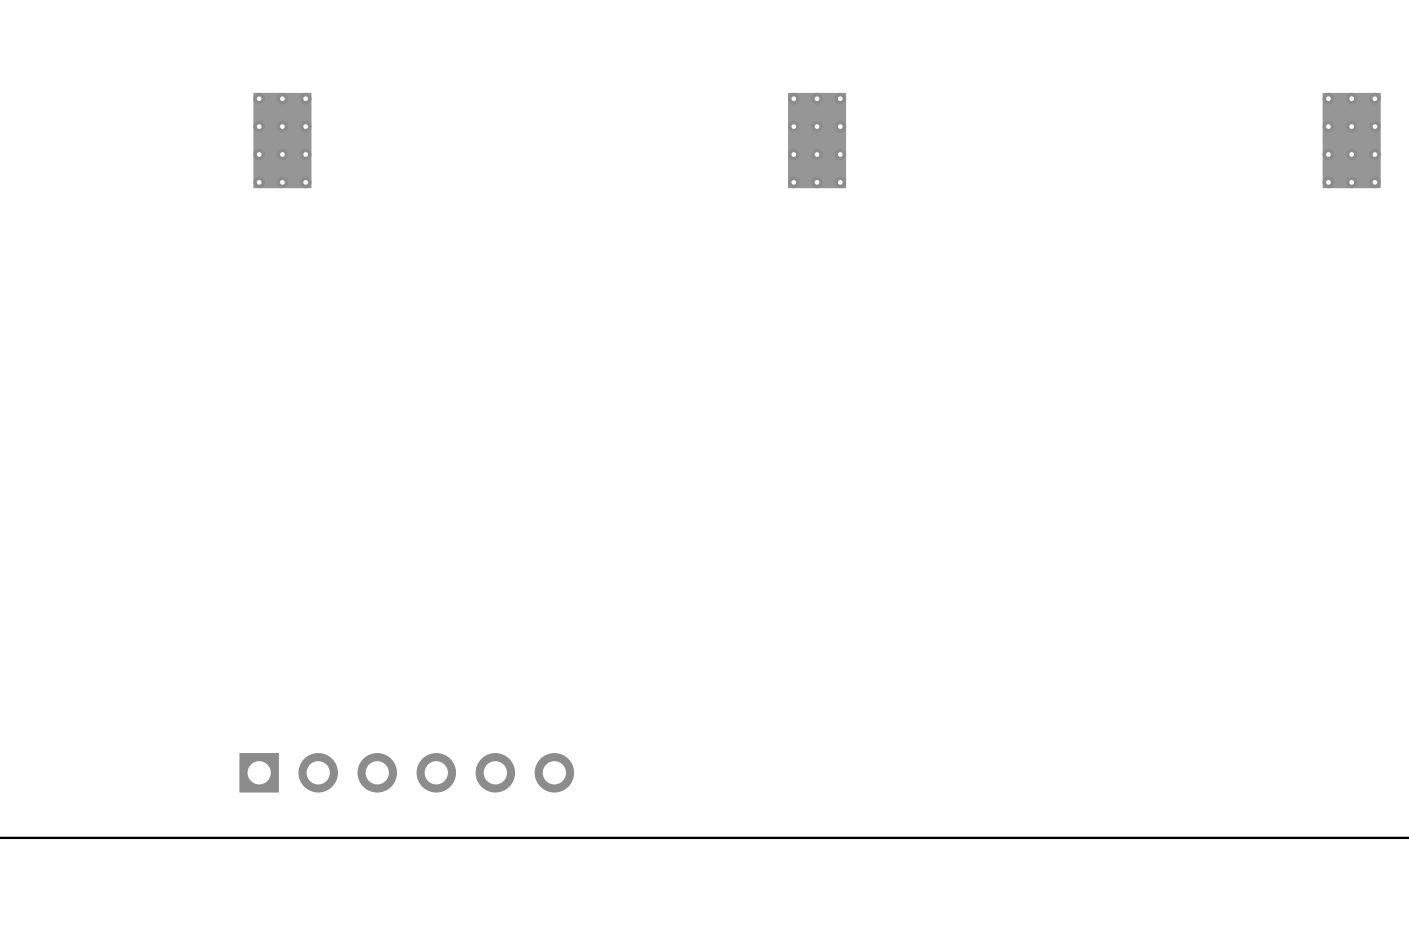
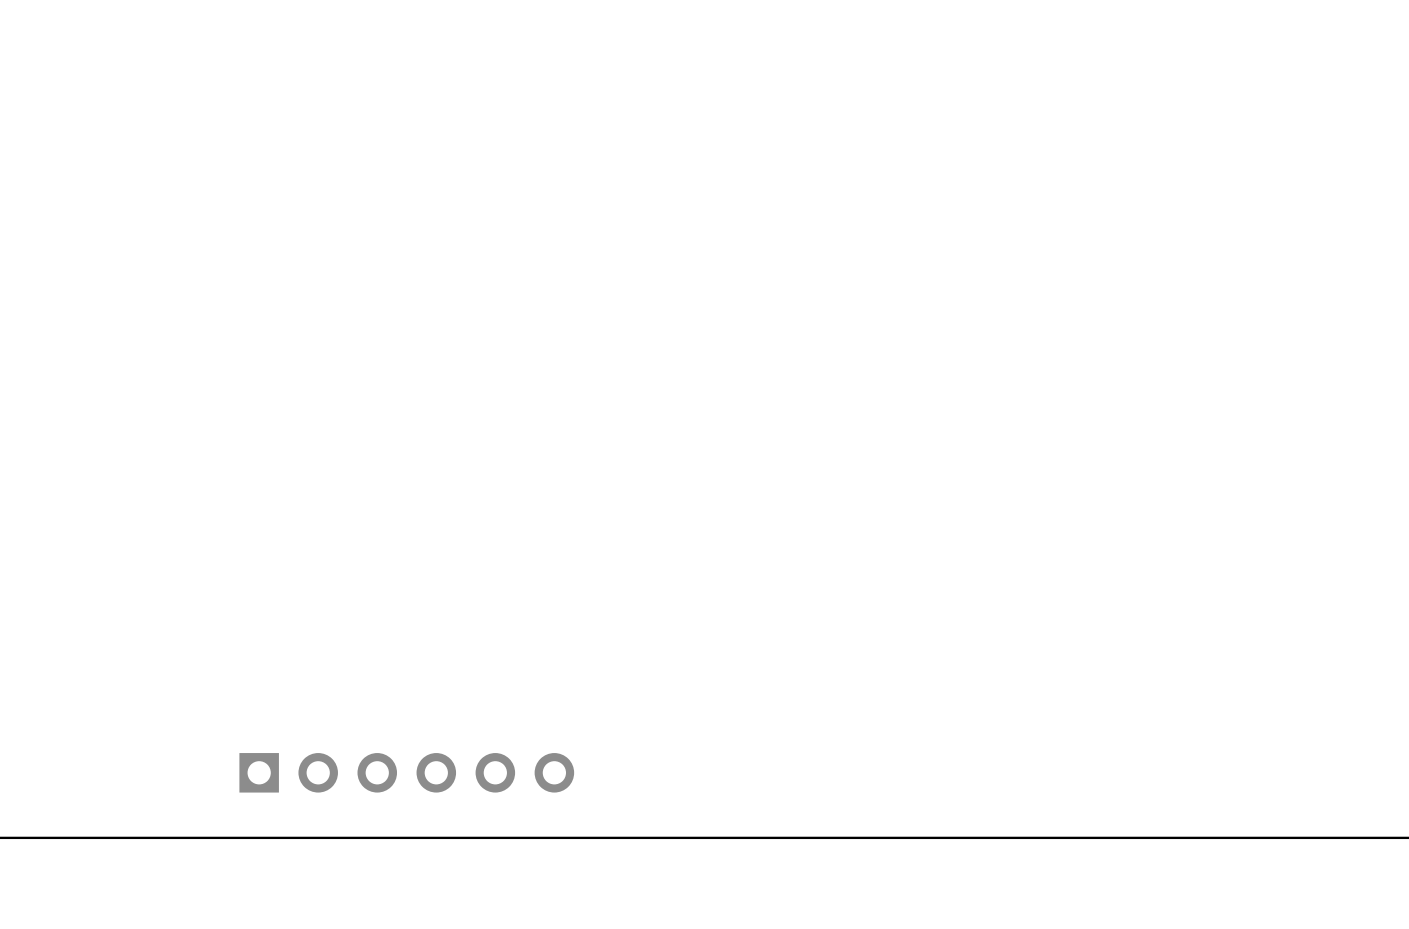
part: (282, 140) -> none
part: (817, 140) -> none
part: (1351, 140) -> none

